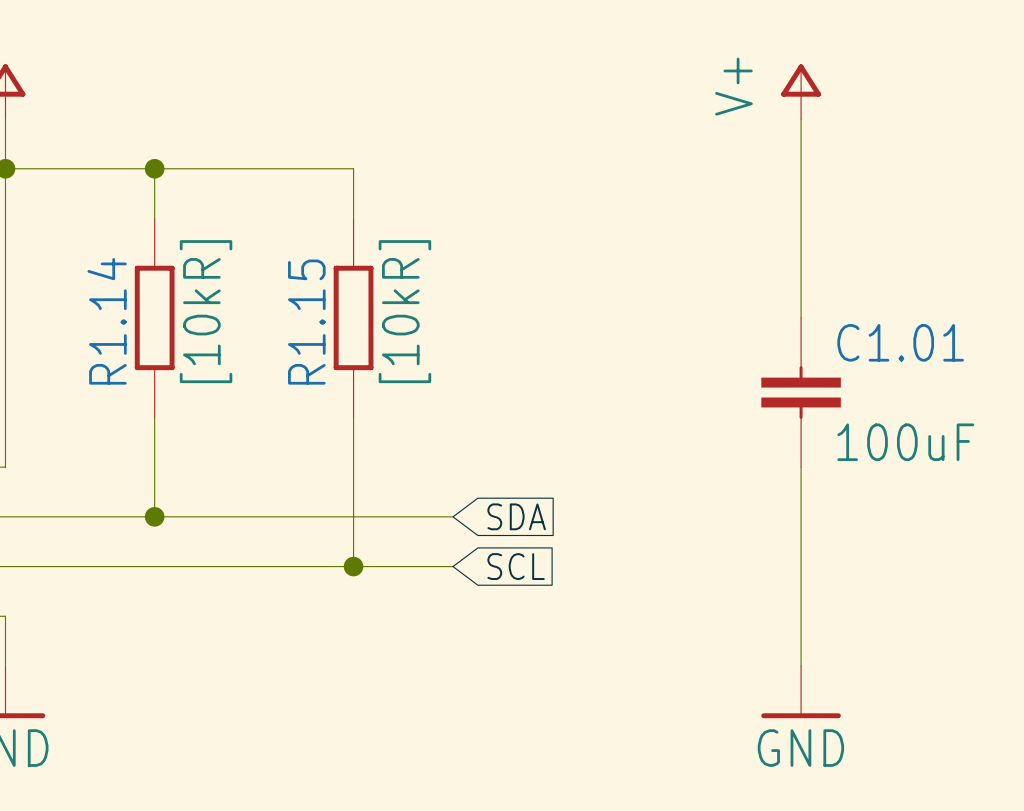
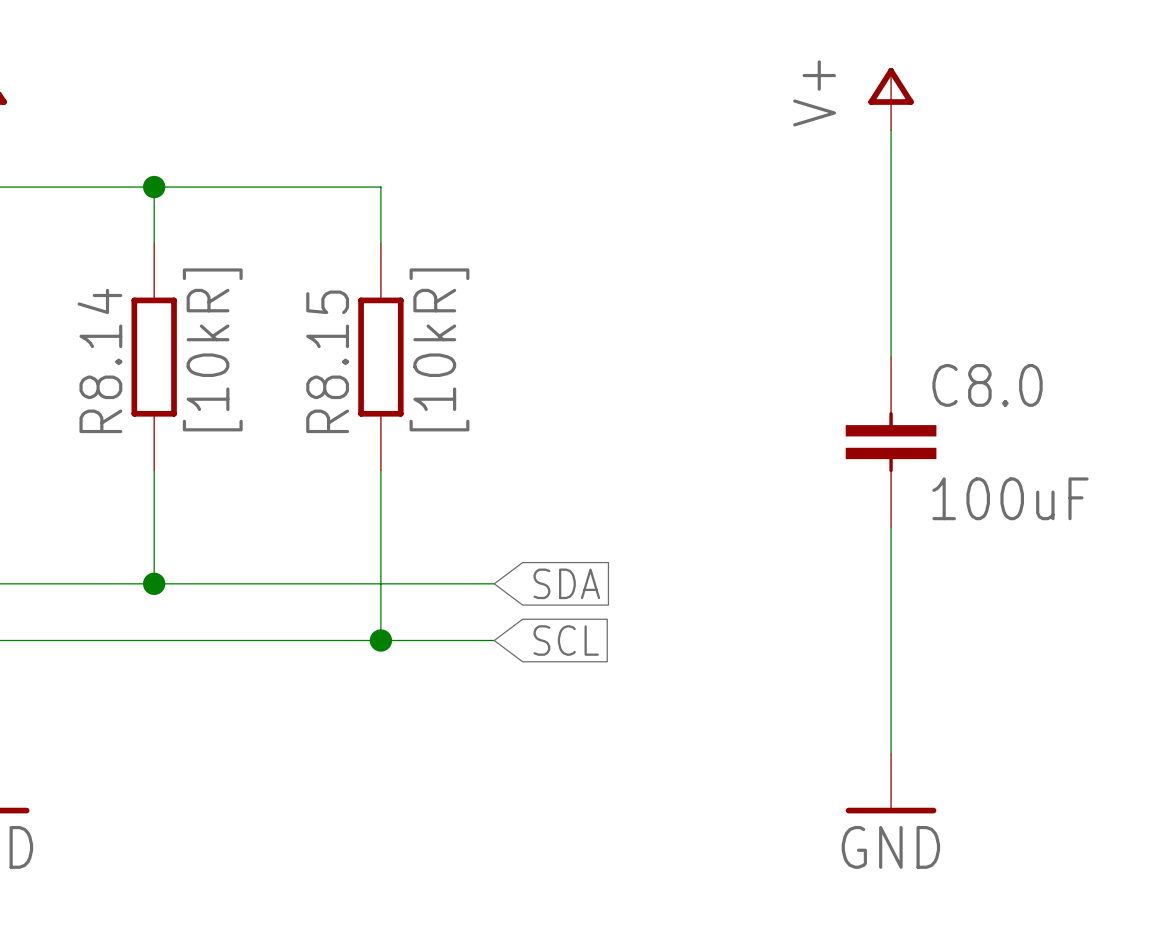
R1.14 name: R1.14 (107, 321) -> R8.14 (99, 360)
R1.15 name: R1.15 (306, 322) -> R8.15 (327, 361)
C1.01 name: C1.01 (900, 342) -> C8.0 (987, 385)

